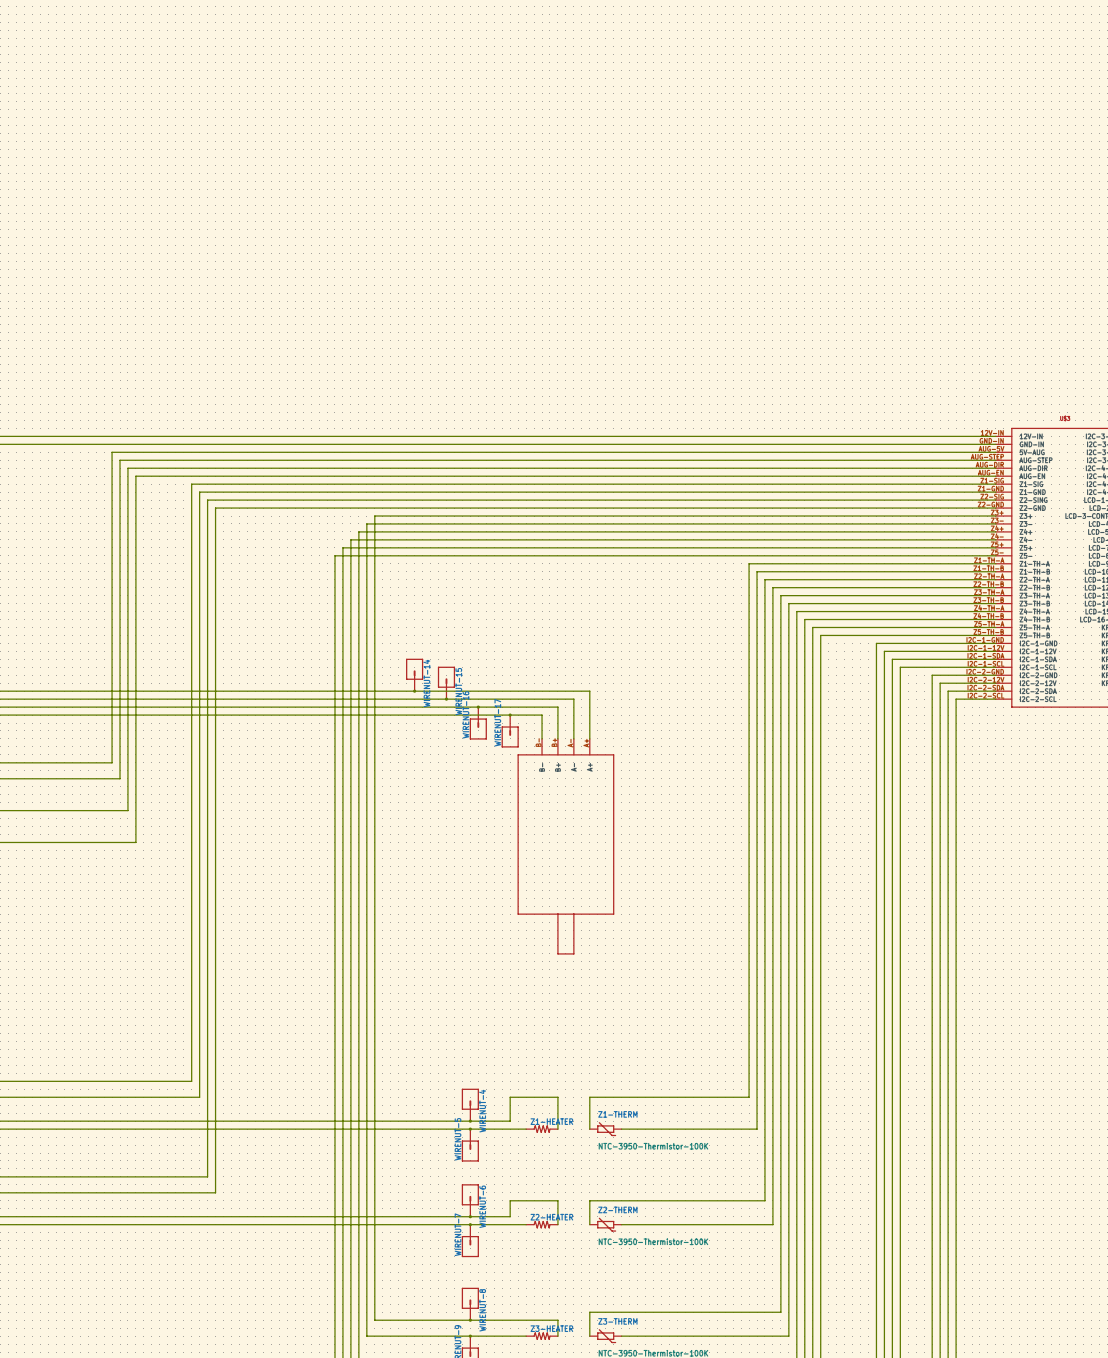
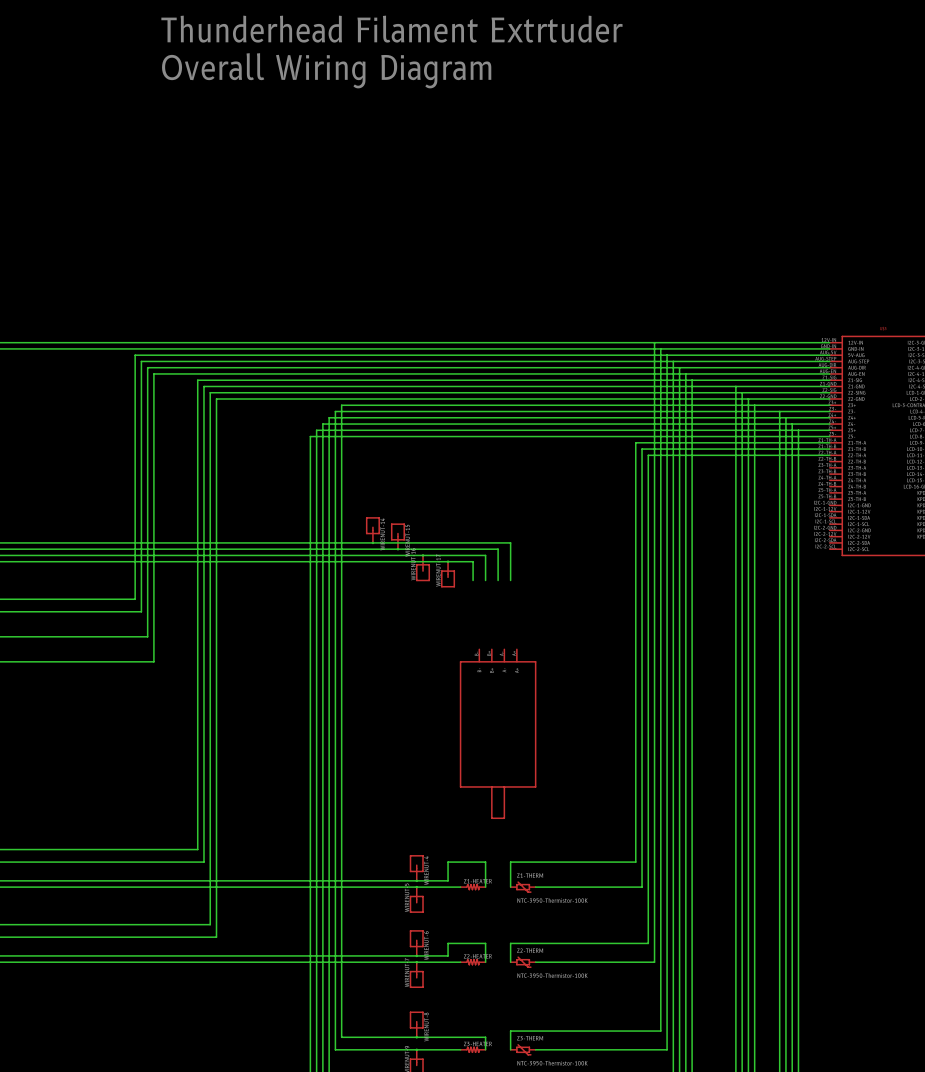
text: none -> Thunderhead Filament Extrtuder (391, 29)
text: none -> Overall Wiring Diagram (326, 70)
wire: (772, 587) (995, 587) -> (654, 461) (654, 342)
wire: (780, 595) (995, 595) -> (660, 467) (660, 348)
wire: (788, 603) (995, 603) -> (667, 474) (667, 355)
wire: (796, 611) (995, 611) -> (673, 480) (673, 361)
wire: (804, 619) (995, 619) -> (679, 486) (679, 367)
wire: (812, 627) (995, 627) -> (685, 492) (685, 373)
wire: (820, 635) (995, 635) -> (692, 499) (692, 380)
wire: (876, 643) (995, 643) -> (735, 505) (735, 386)
wire: (884, 651) (995, 651) -> (742, 511) (742, 392)
wire: (892, 659) (995, 659) -> (748, 517) (748, 399)
wire: (900, 667) (995, 667) -> (754, 524) (754, 405)
wire: (932, 675) (995, 675) -> (779, 530) (779, 411)
wire: (940, 683) (995, 683) -> (785, 536) (785, 417)
wire: (948, 691) (995, 691) -> (792, 542) (792, 424)
wire: (956, 699) (995, 699) -> (798, 549) (798, 430)
part: (565, 846) -> none
part: none -> (498, 733)

